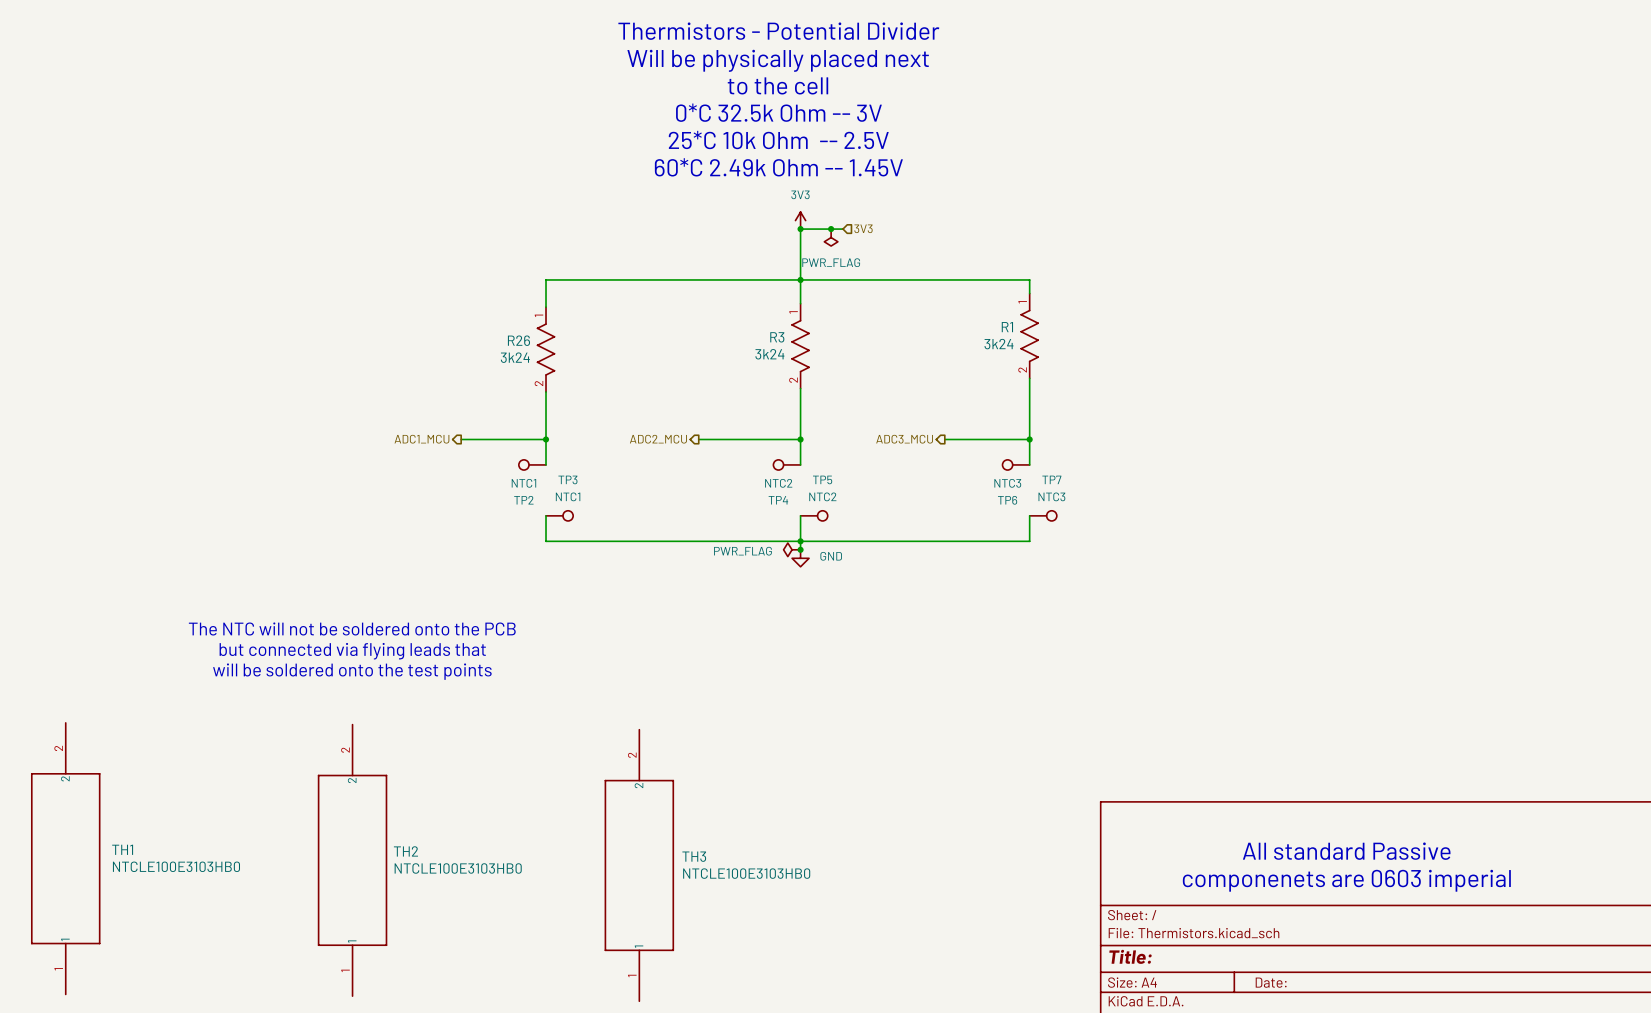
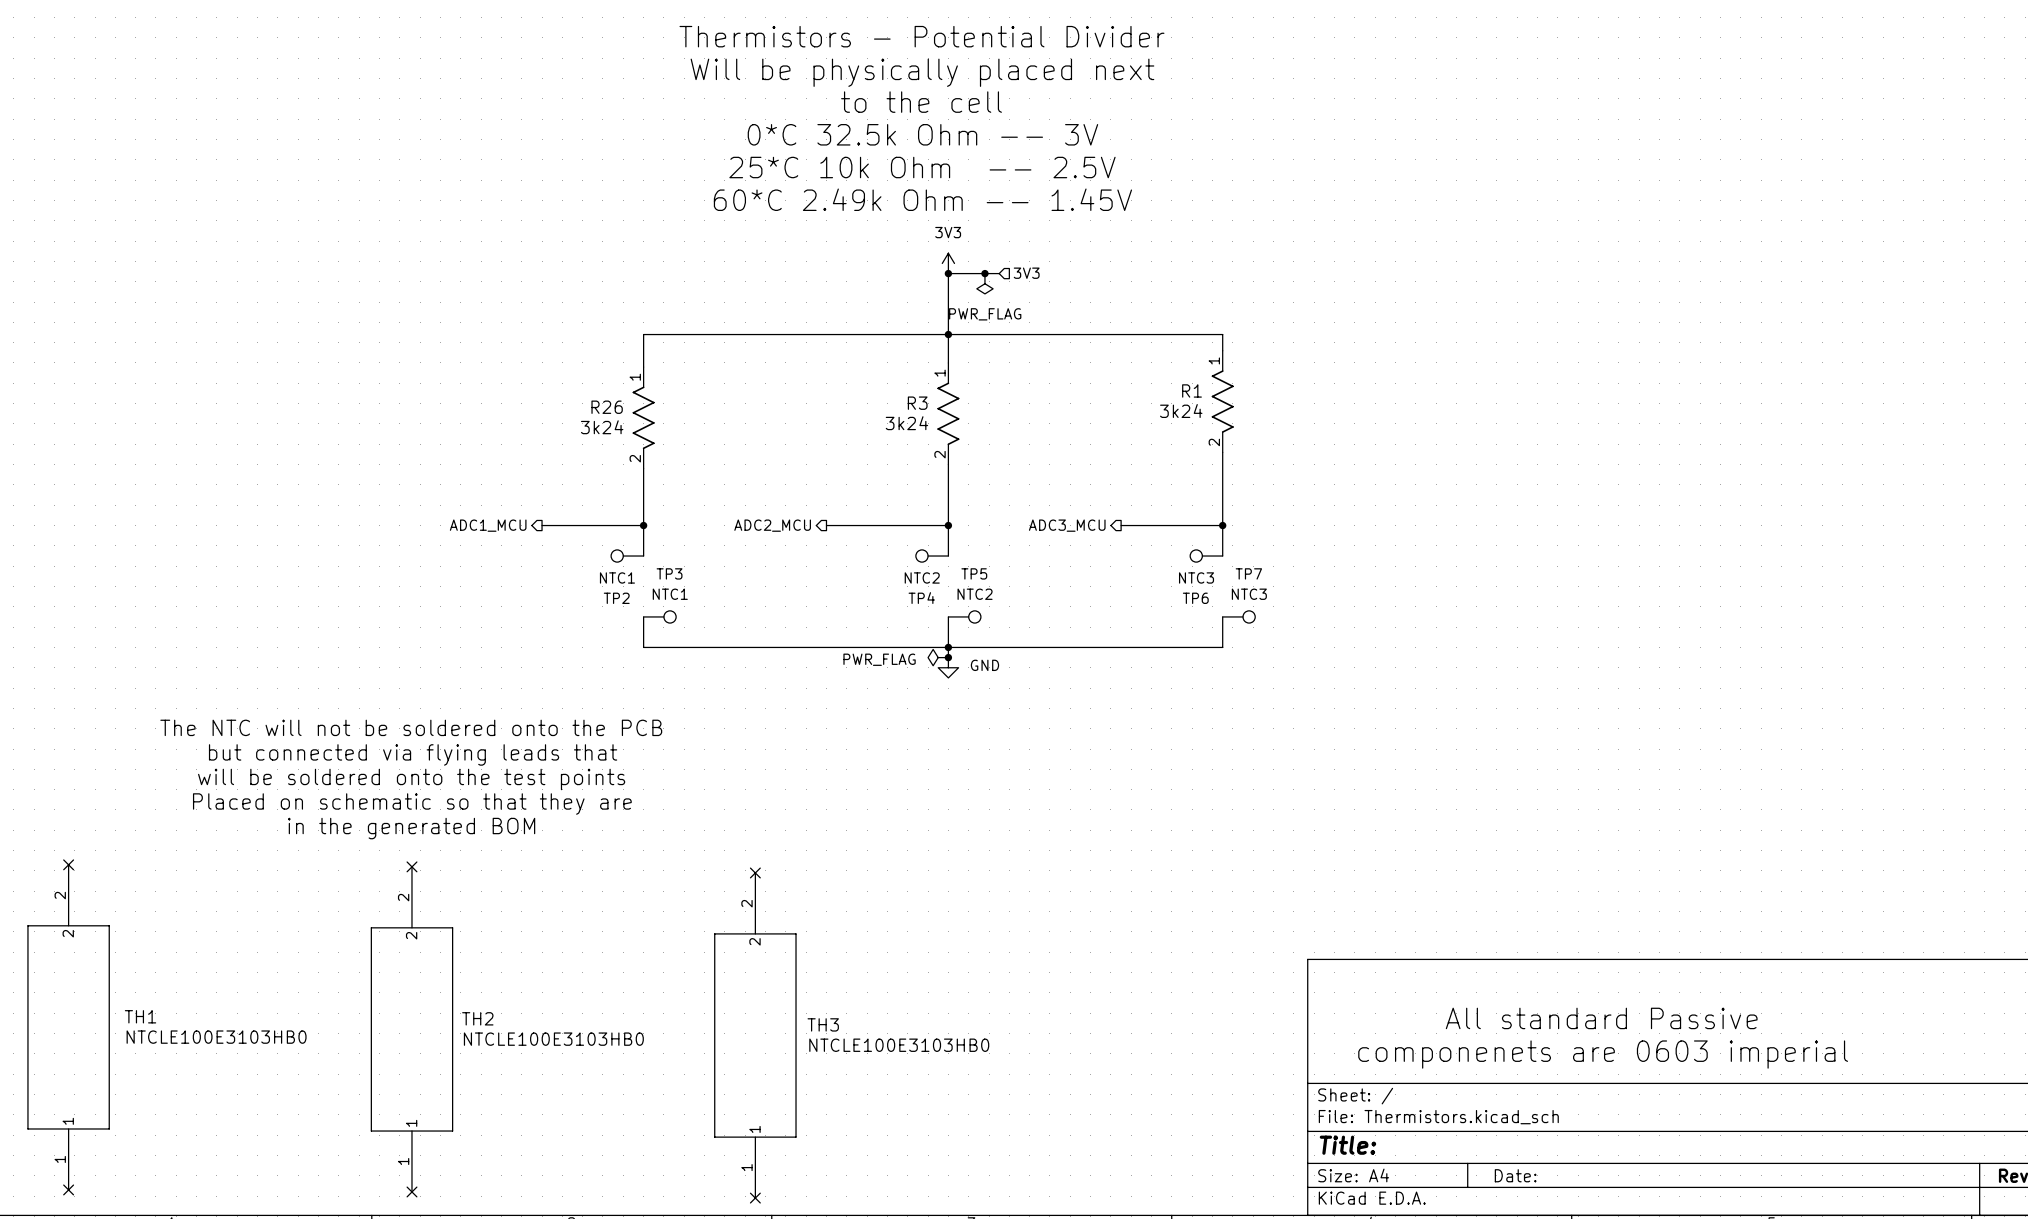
text: none -> The NTC will not be soldered onto the PCB (411, 727)
text: The NTC will not be soldered onto the PCB (352, 628) -> but connected via flying leads that (413, 754)
text: but connected via flying leads that (352, 651) -> will be soldered onto the test points (411, 779)
text: will be soldered onto the test points (352, 671) -> Placed on schematic so that they are (412, 804)
text: none -> in the generated BOM (411, 828)
no-connect mark: none -> (68, 864)
no-connect mark: none -> (411, 866)
no-connect mark: none -> (755, 872)
no-connect mark: none -> (68, 1189)
no-connect mark: none -> (411, 1191)
no-connect mark: none -> (755, 1198)

